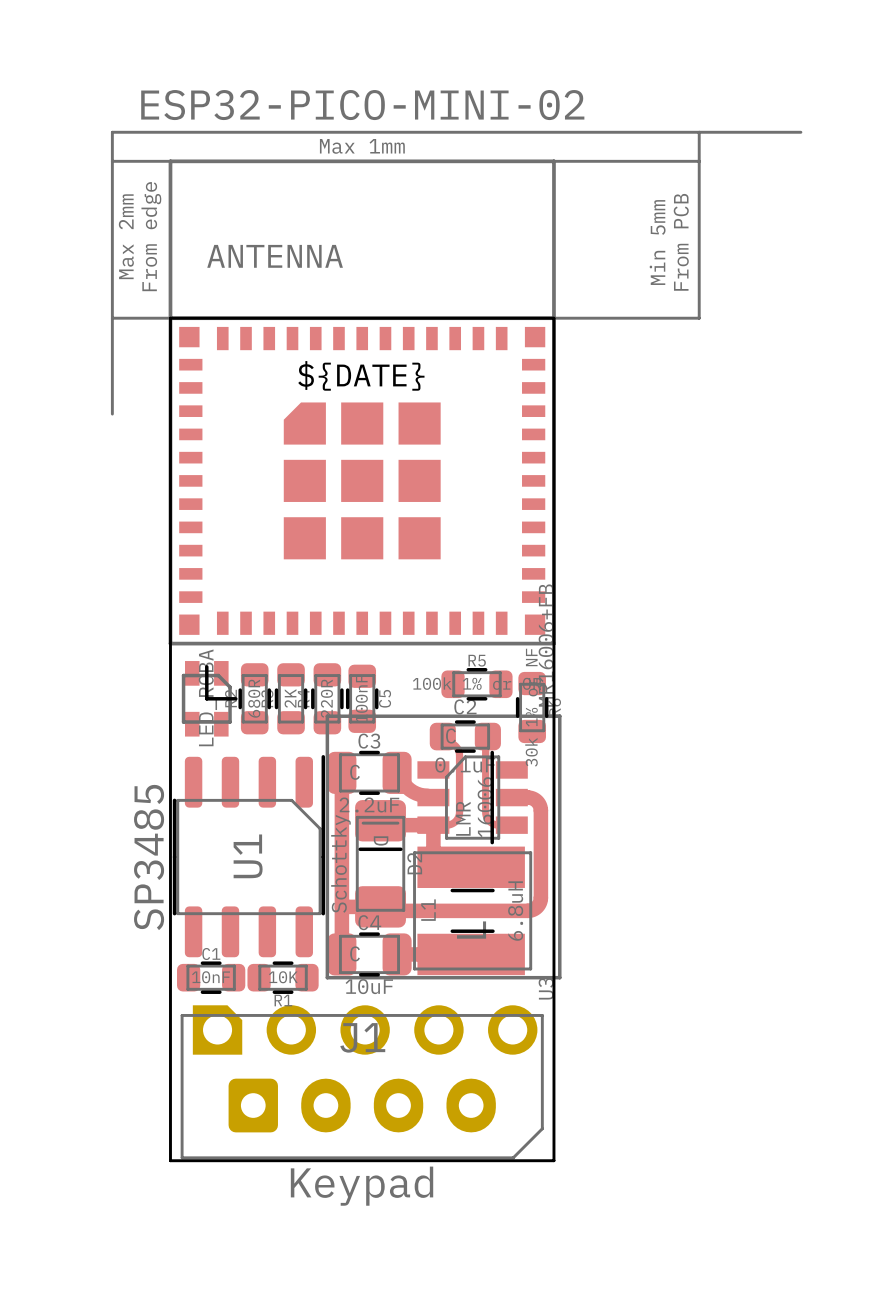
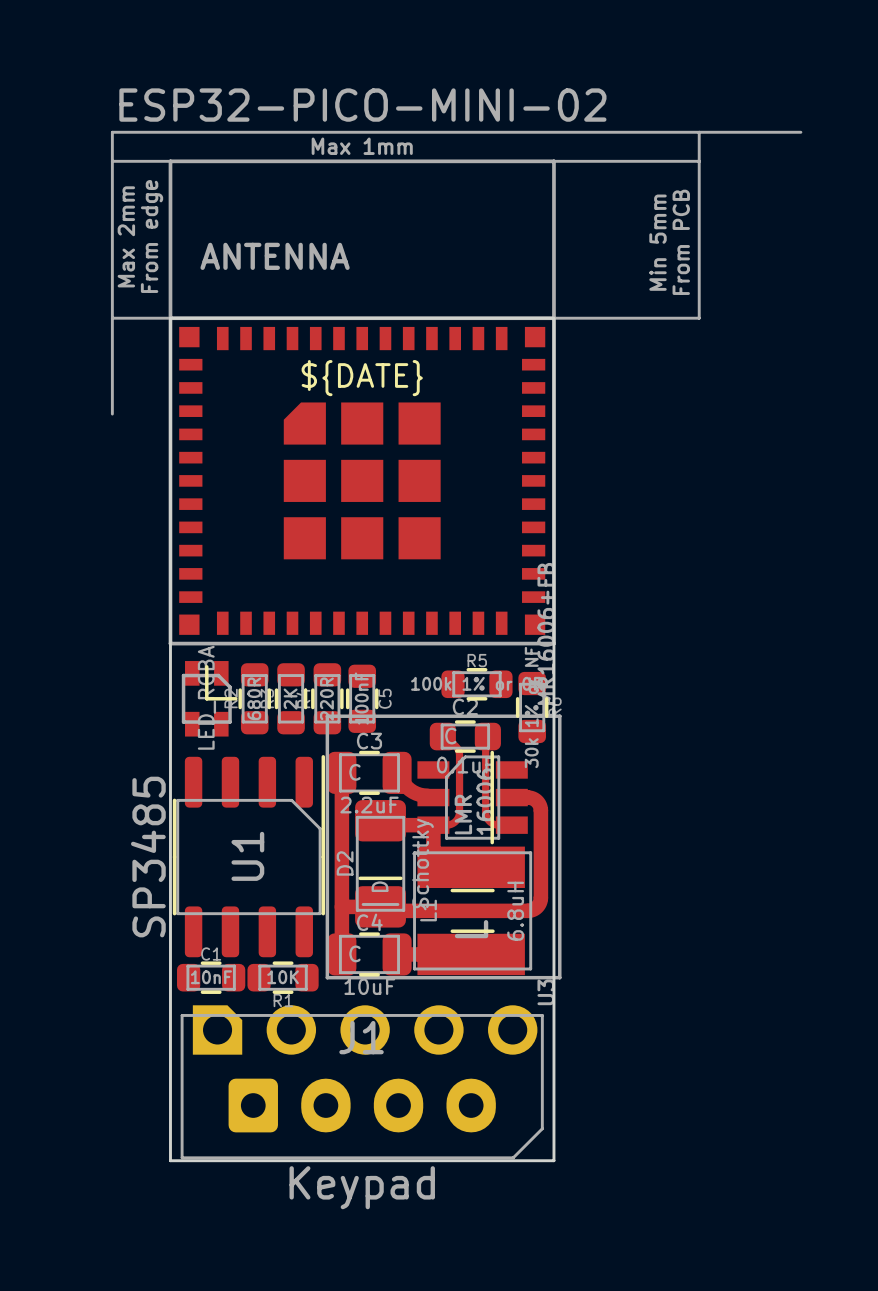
D2 rotation: 0° (380, 863) -> 180° (380, 863)

